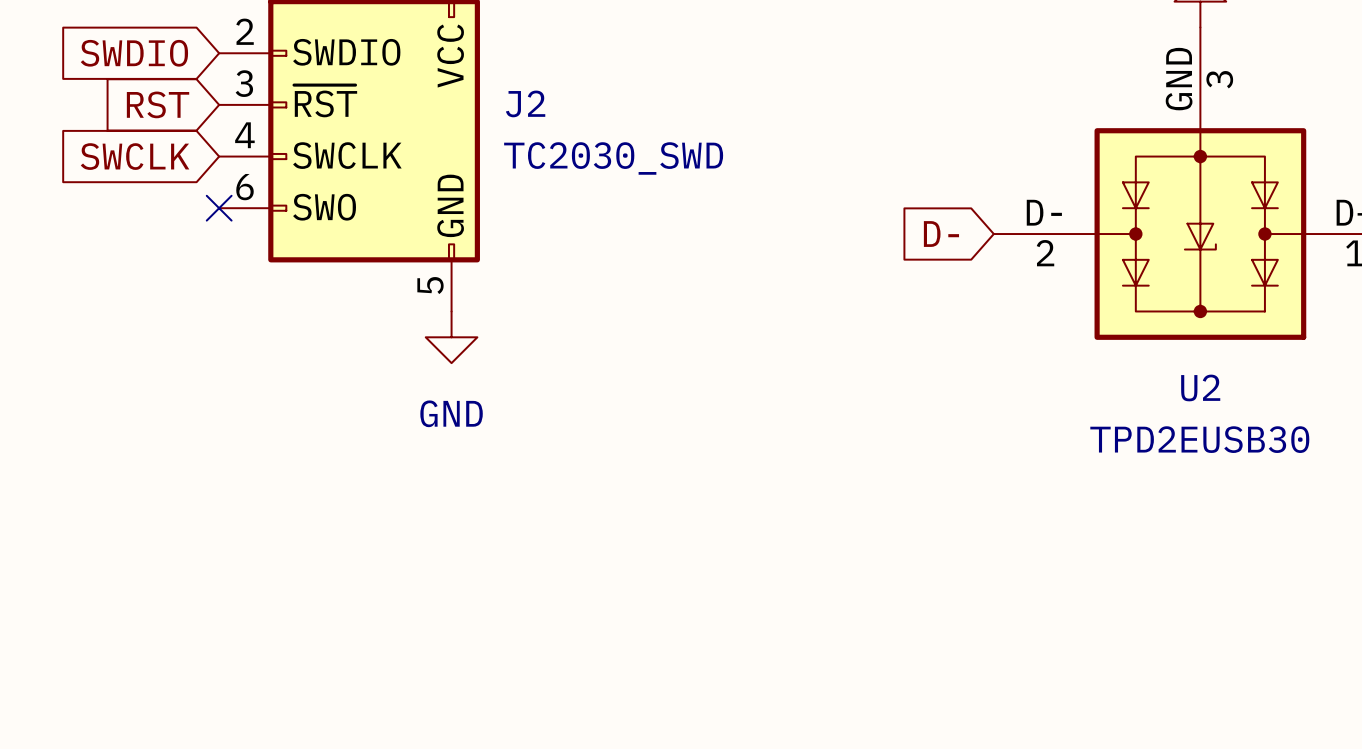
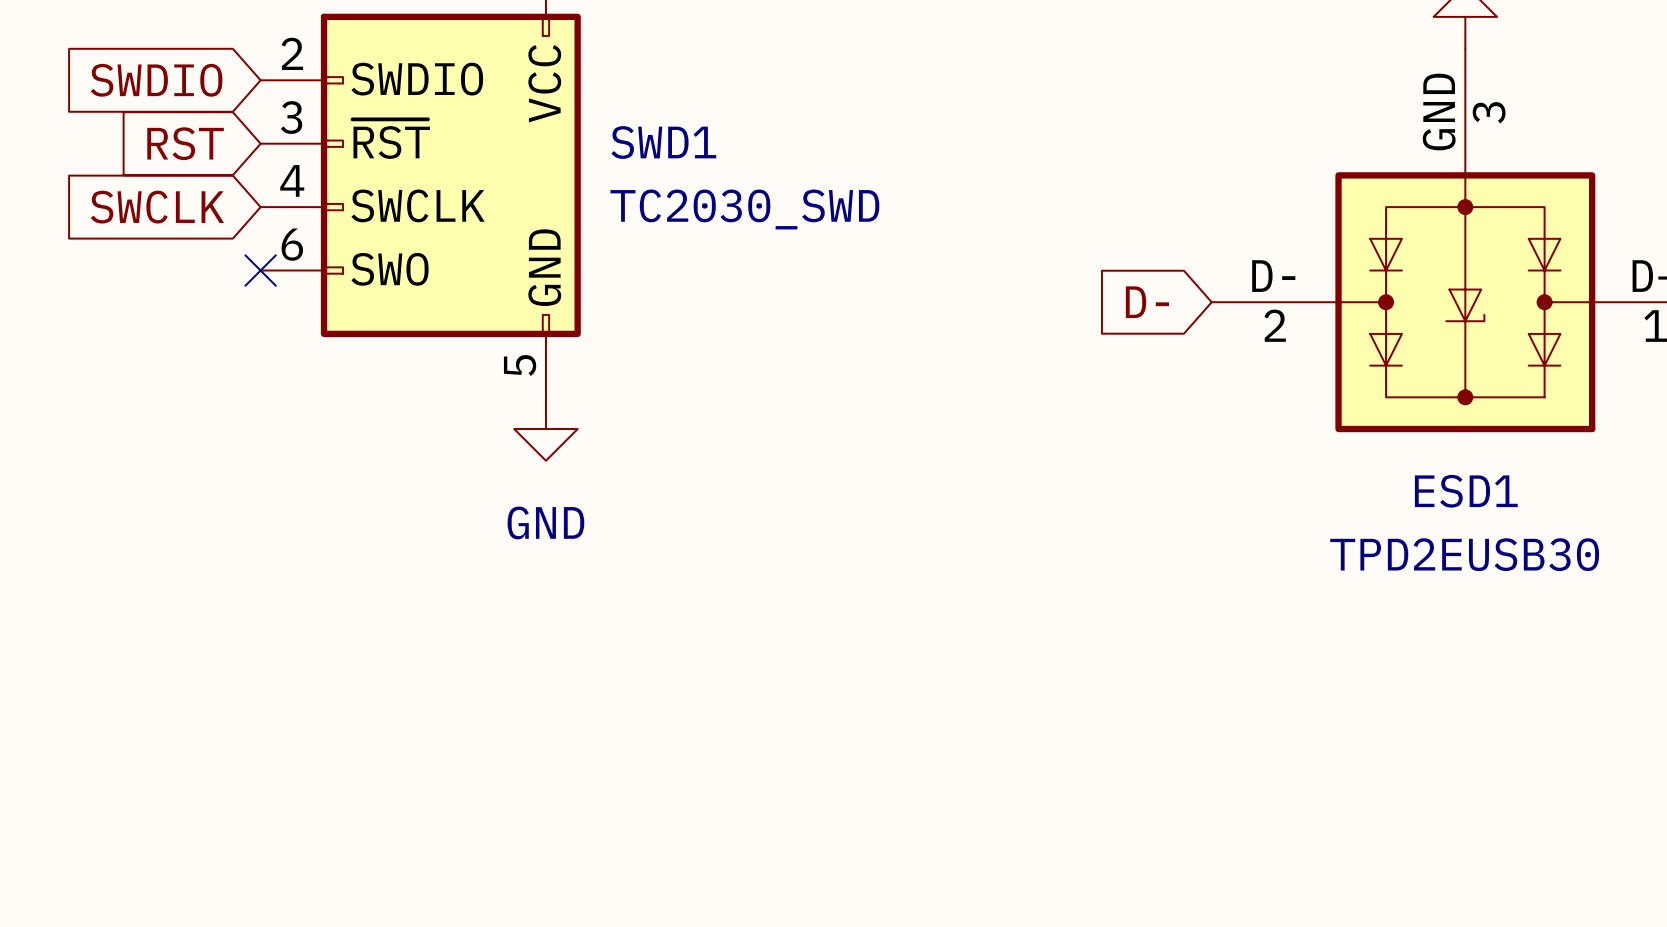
J2 name: J2 (525, 103) -> SWD1 (663, 142)
U2 name: U2 (1200, 387) -> ESD1 (1466, 491)

